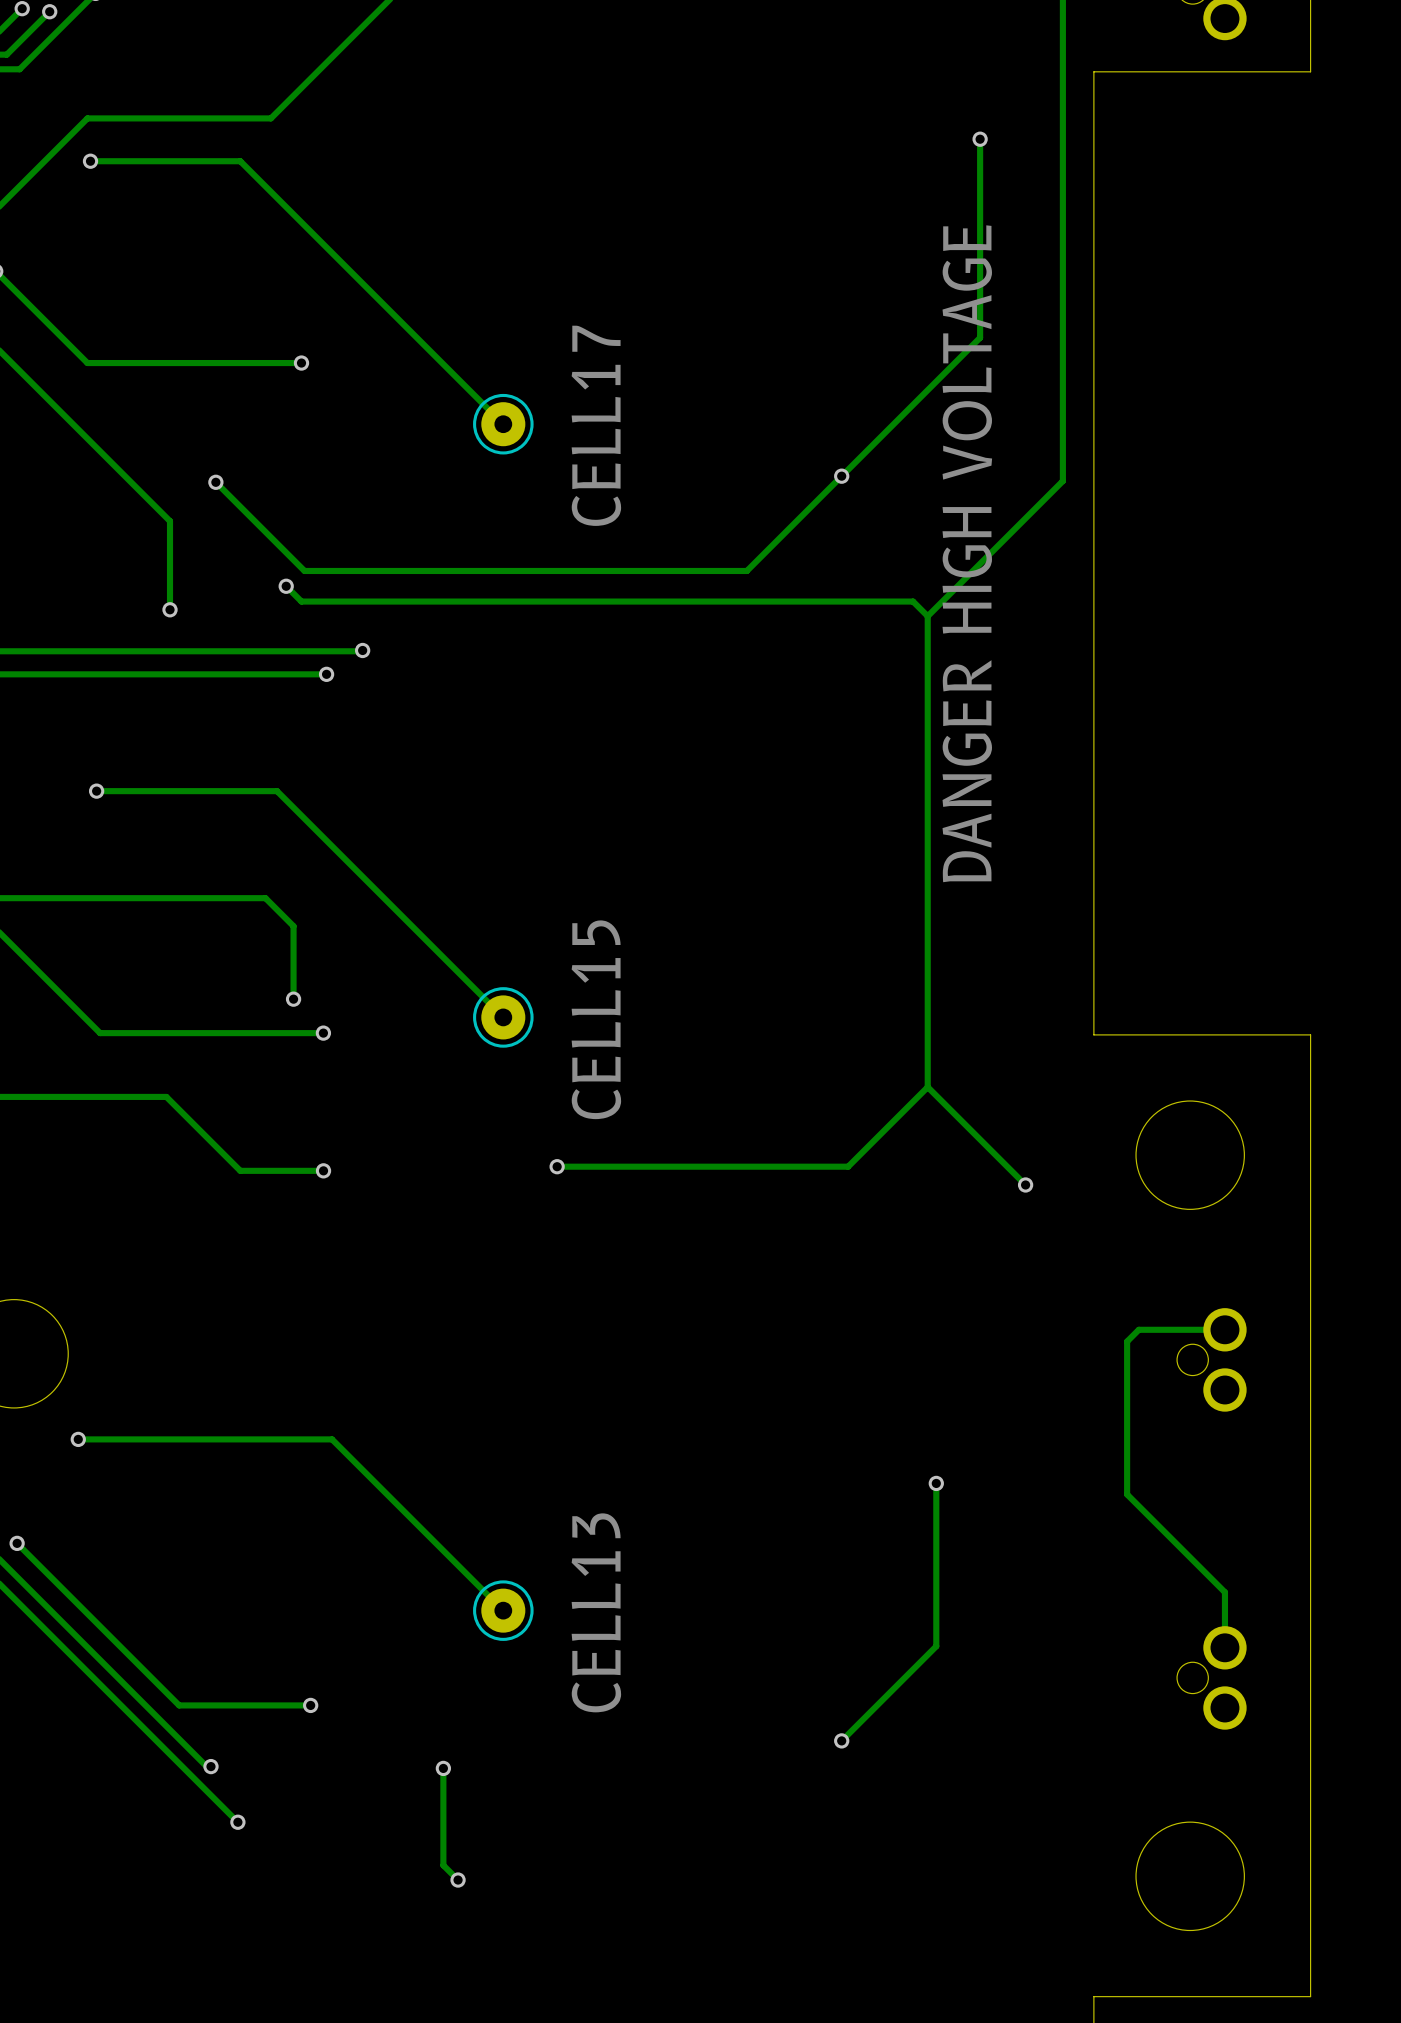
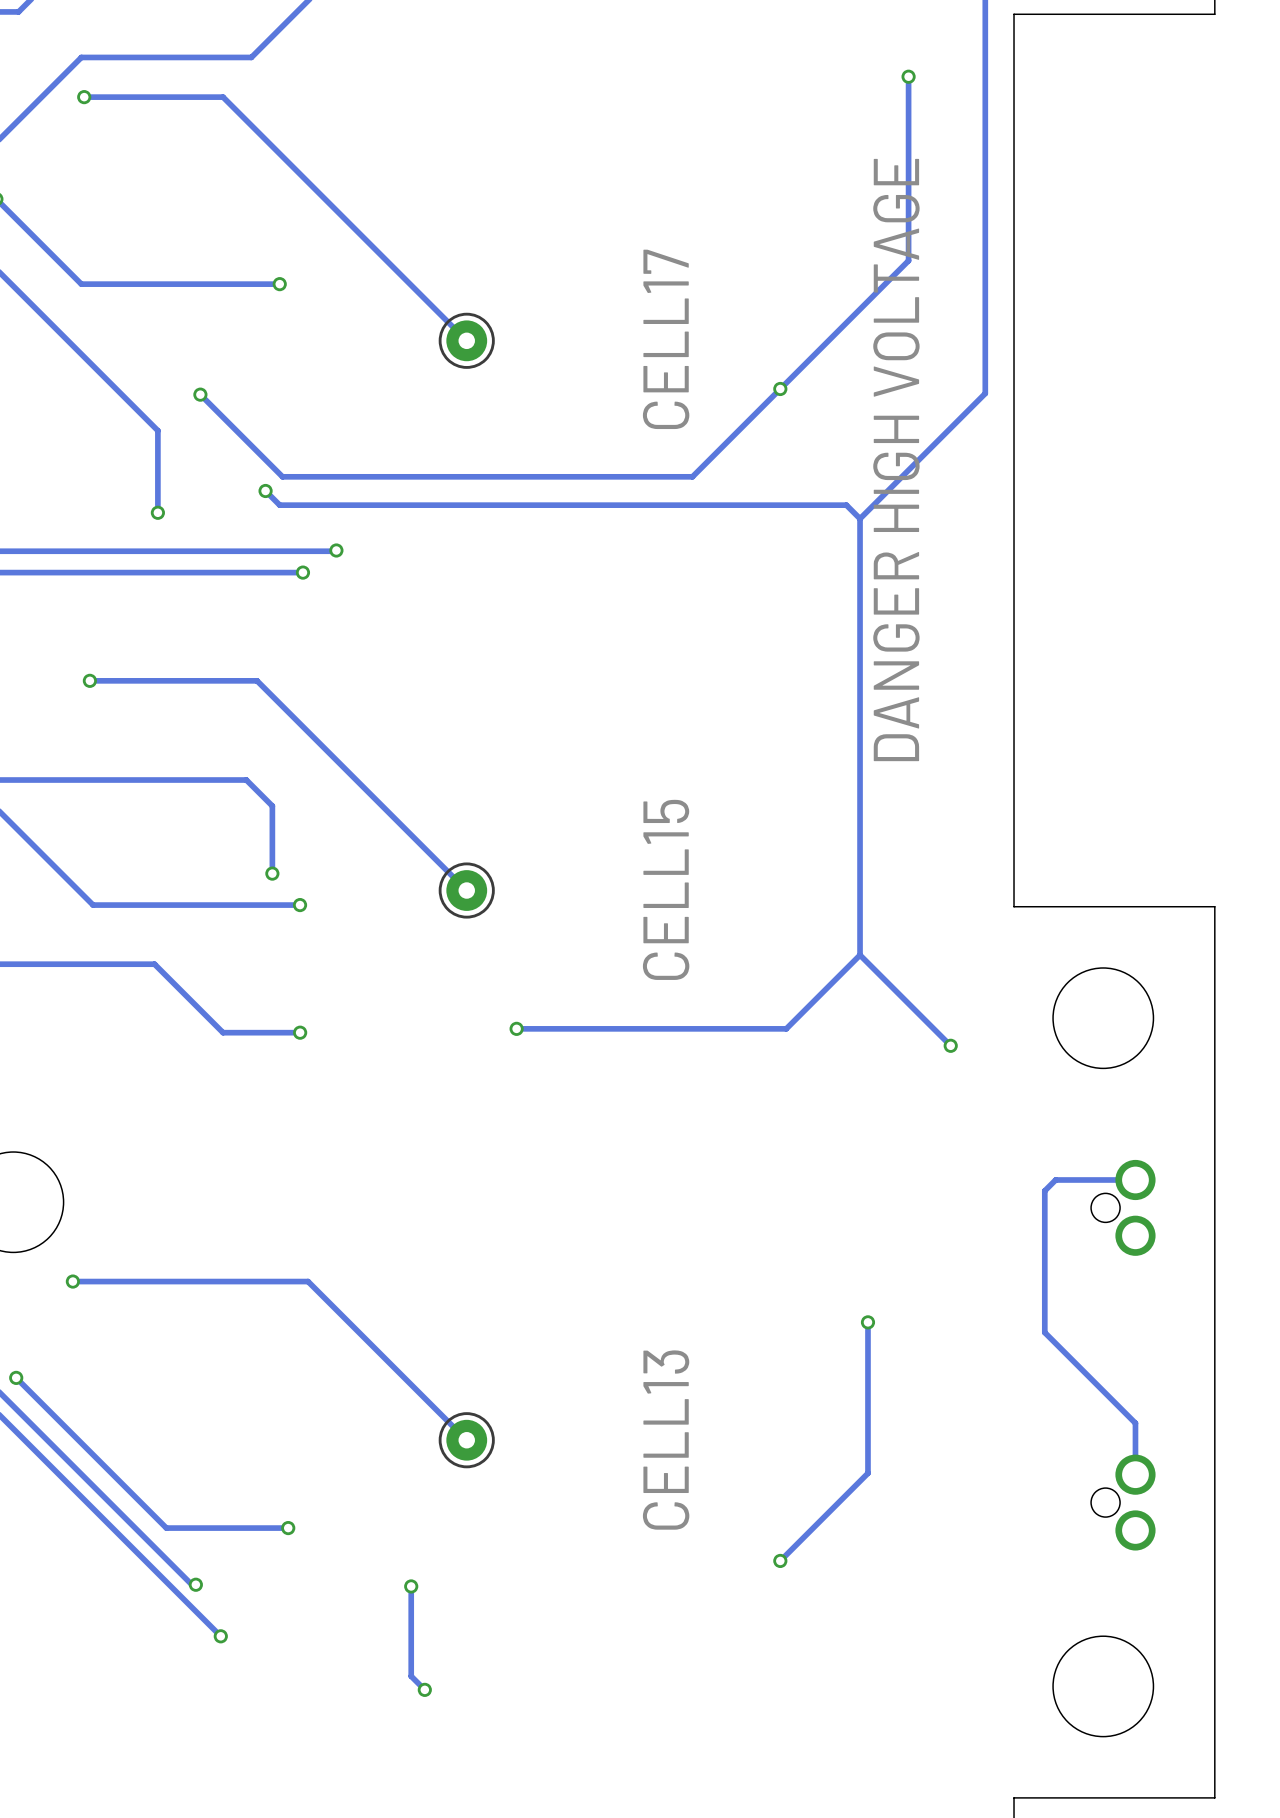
CELL17 name position: CELL17 (596, 425) -> CELL17 (666, 339)
CELL15 name position: CELL15 (596, 1019) -> CELL15 (666, 889)
CELL13 name position: CELL13 (596, 1612) -> CELL13 (666, 1440)

